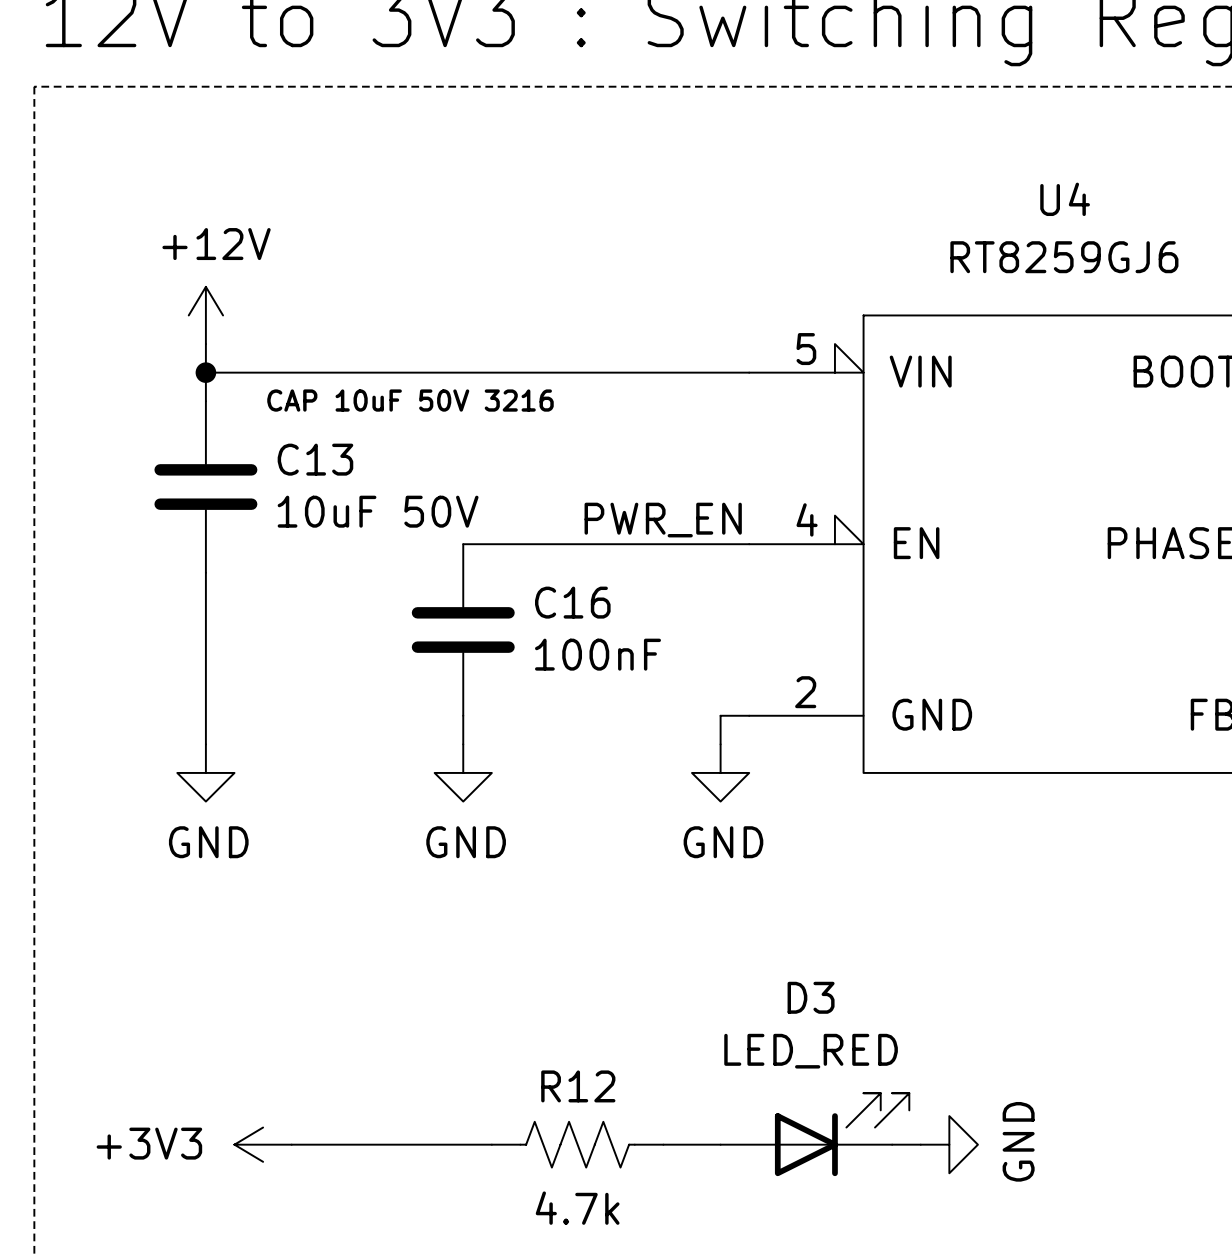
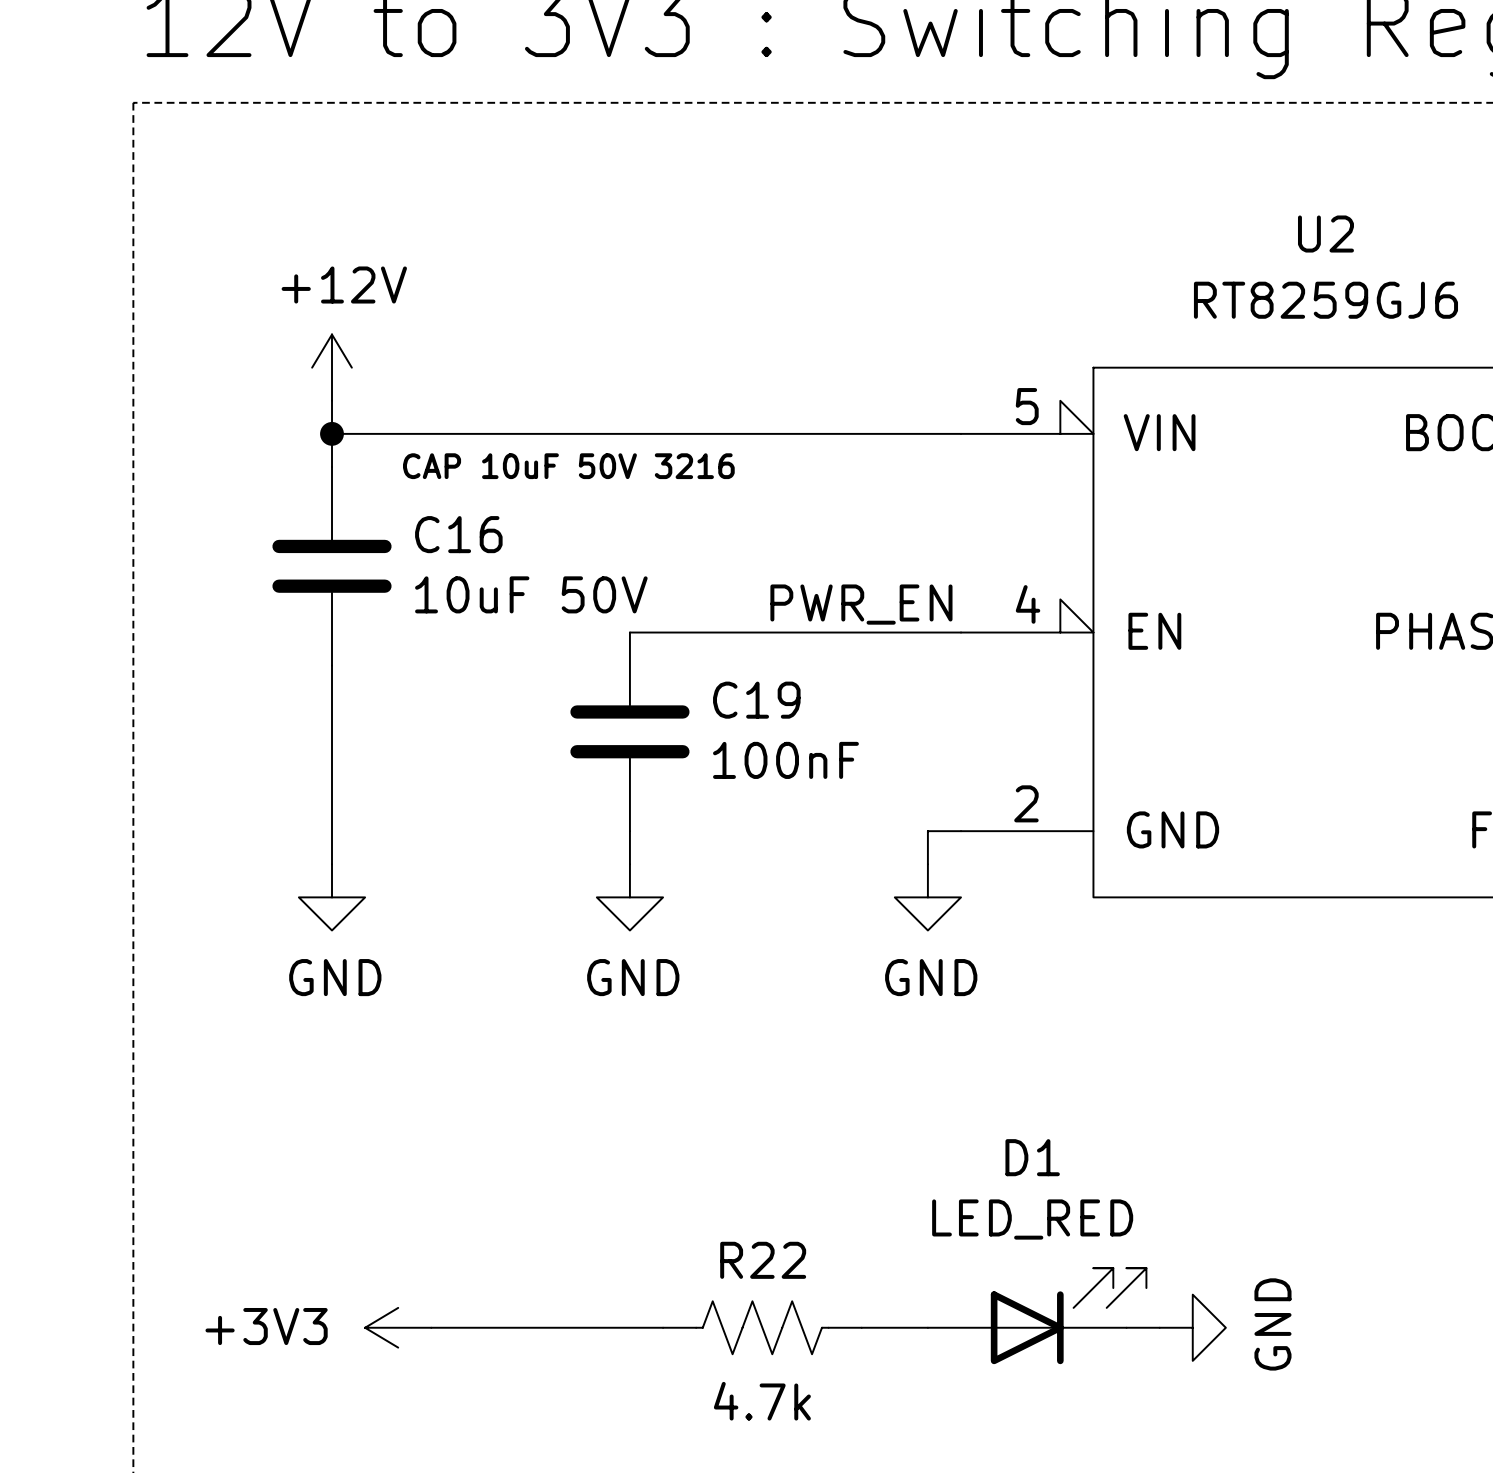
U4 name: U4 (1065, 199) -> U2 (1325, 234)
C13 name: C13 (315, 459) -> C16 (458, 534)
C16 name: C16 (572, 602) -> C19 (756, 700)
D3 name: D3 (811, 997) -> D1 (1032, 1157)
R12 name: R12 (578, 1086) -> R22 (763, 1260)

